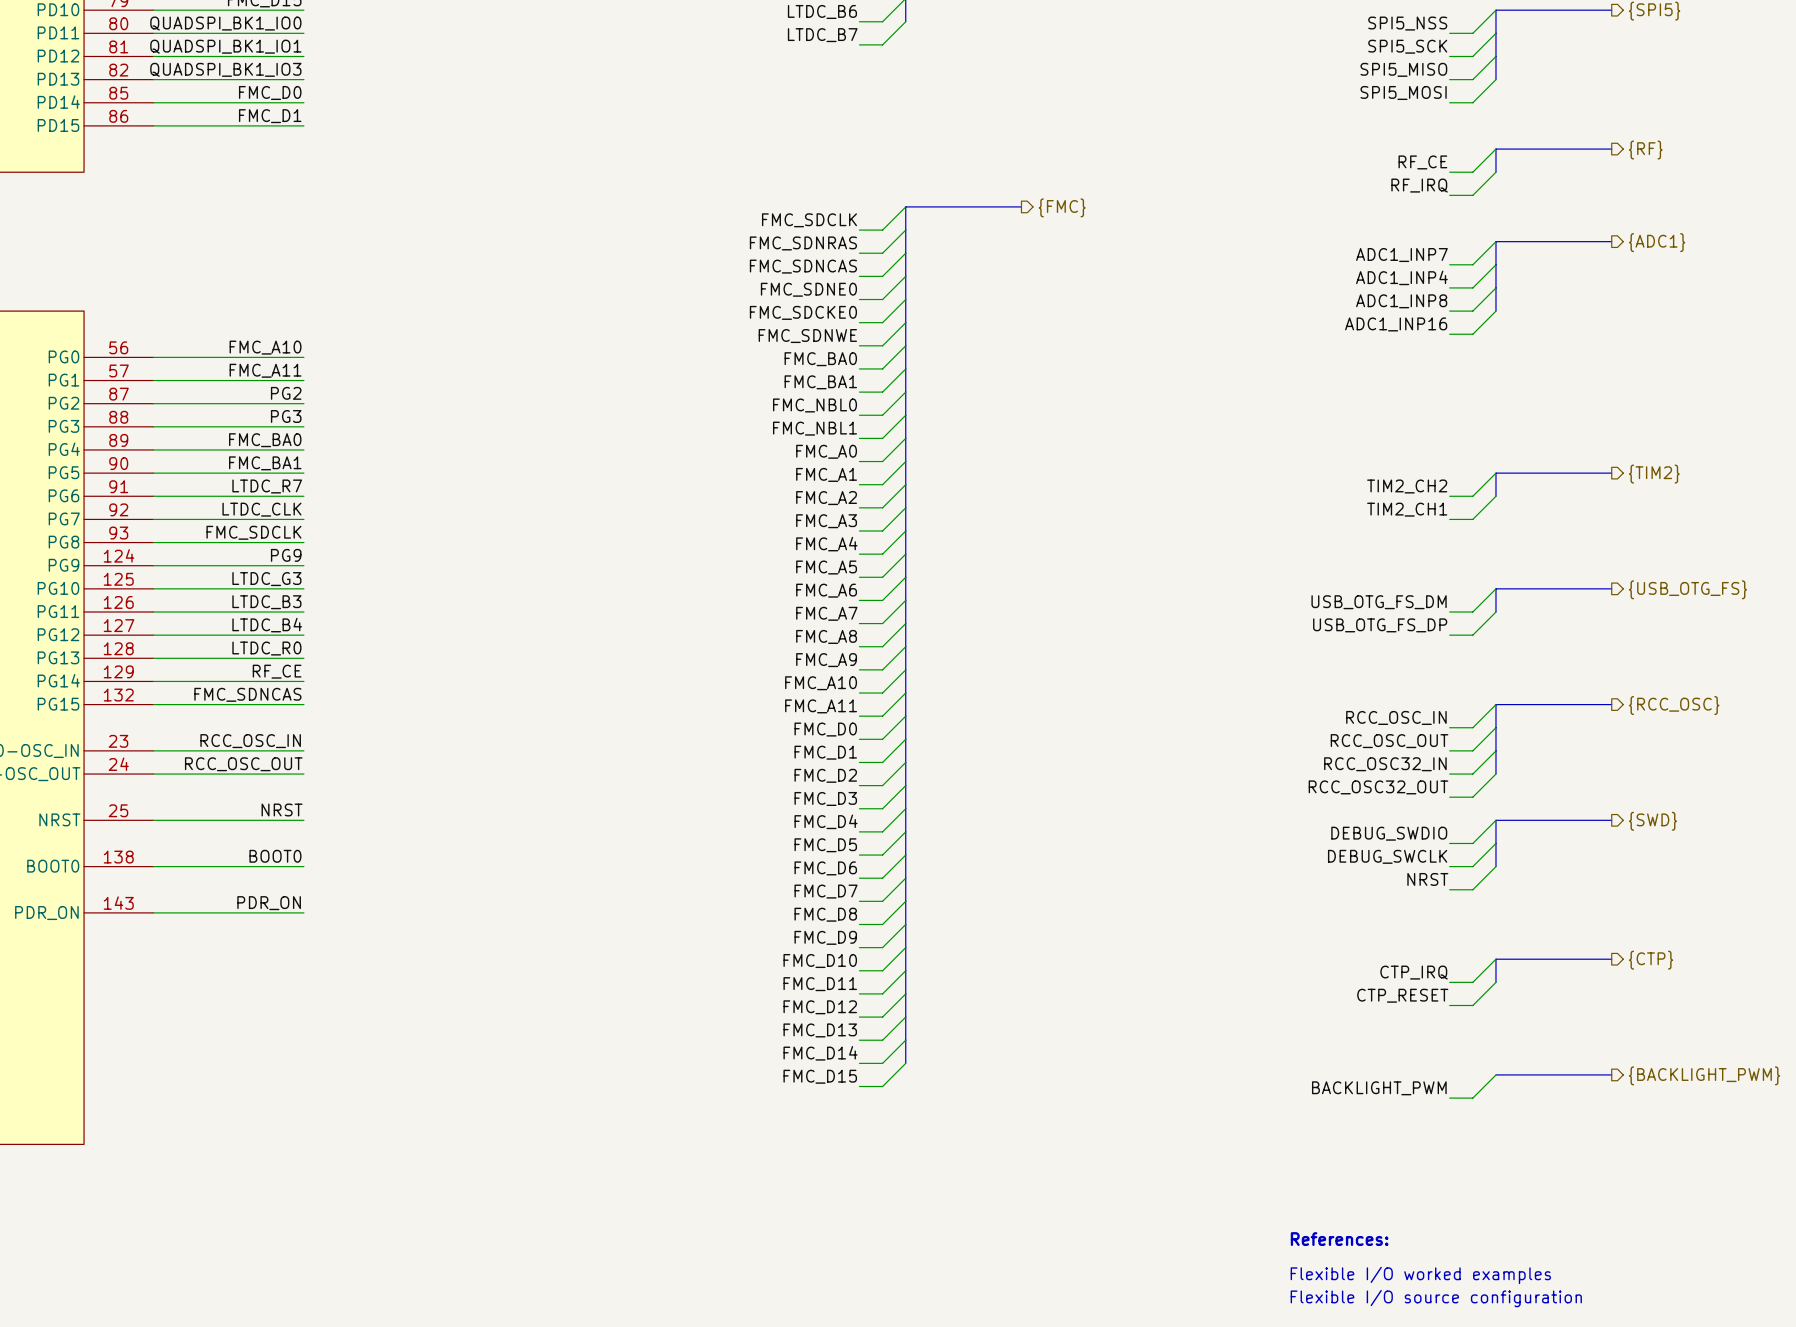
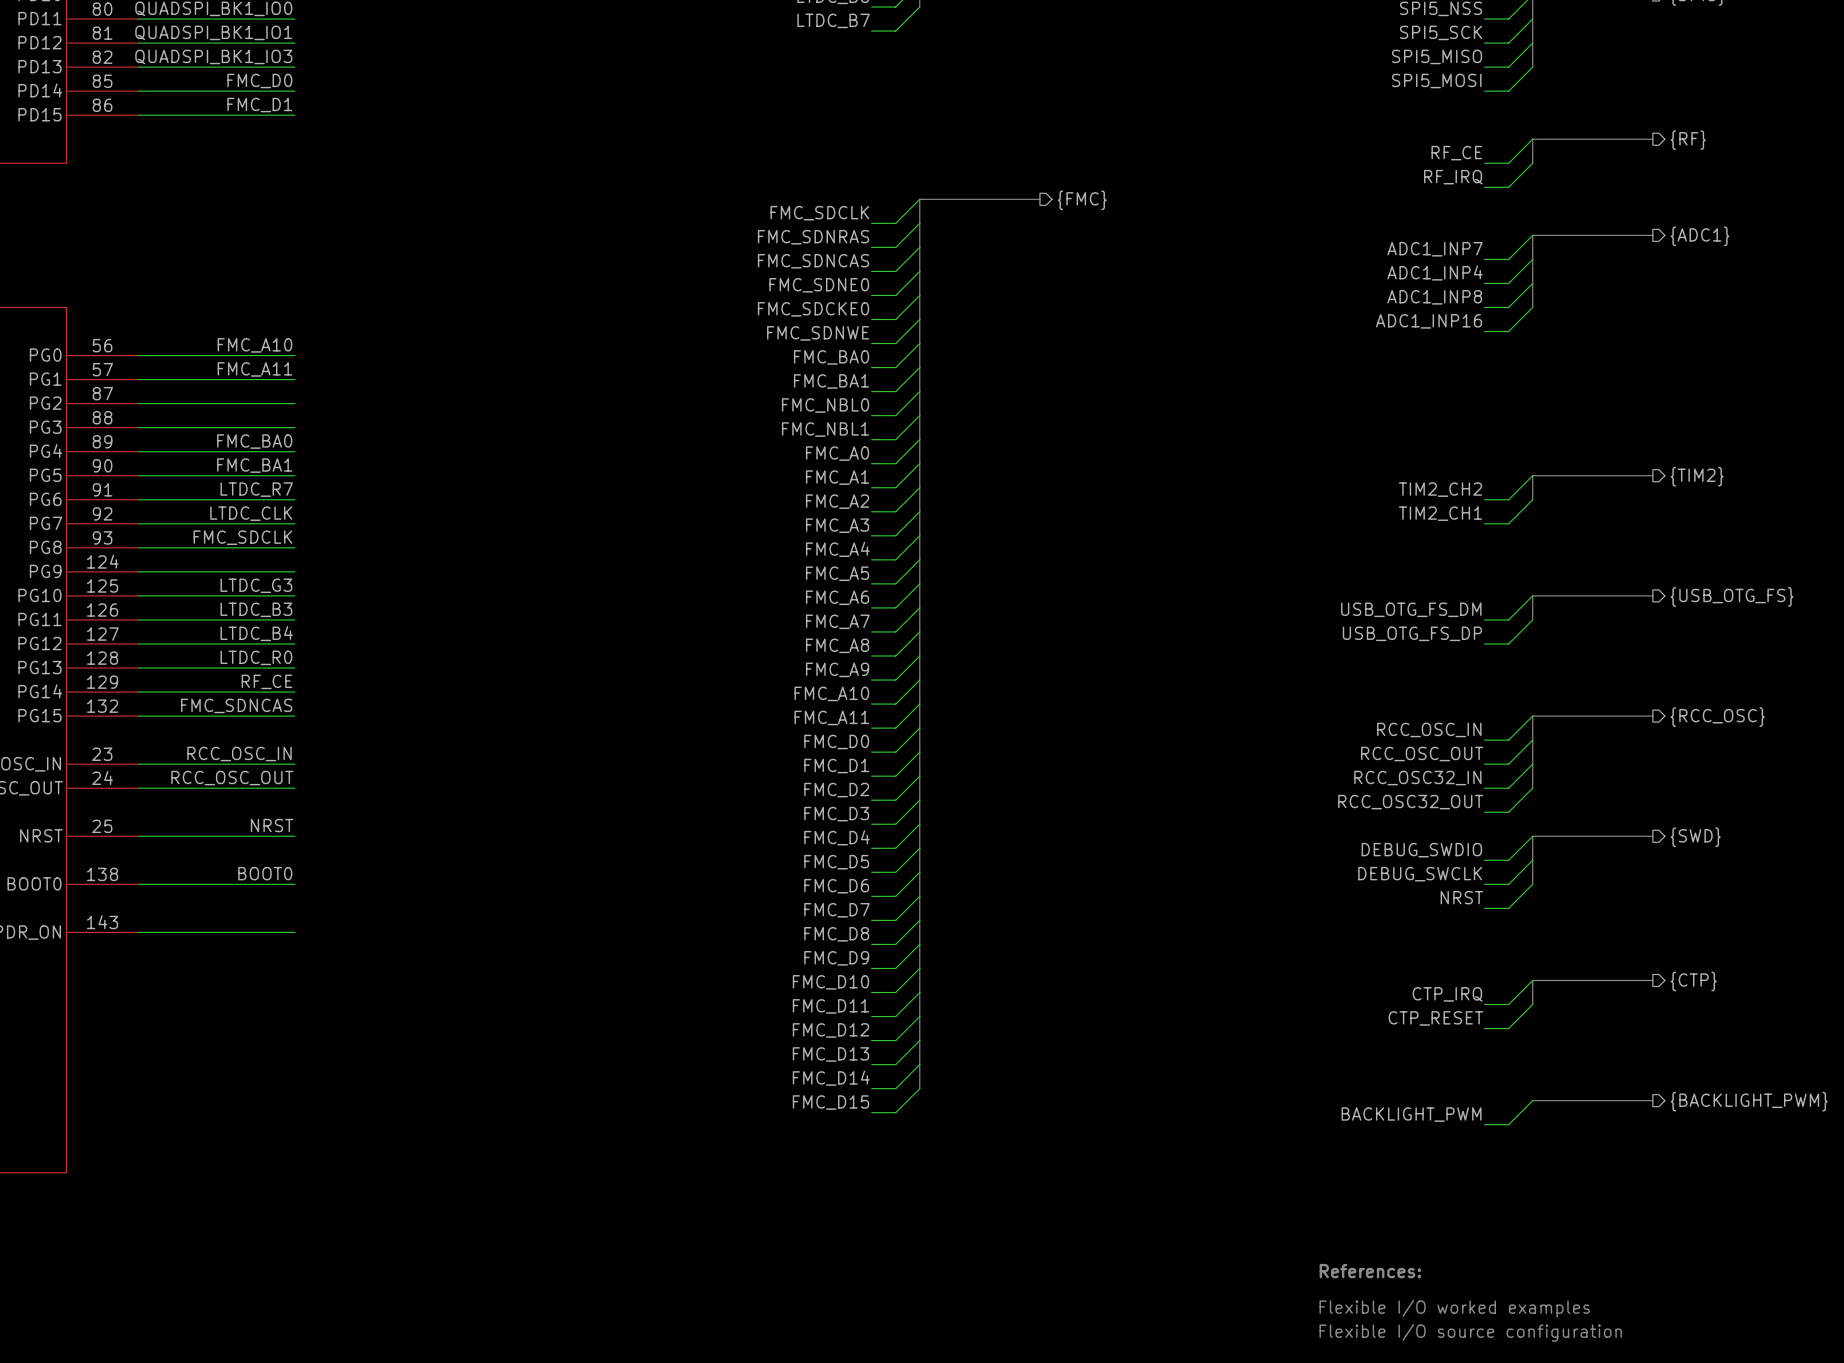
label: PG2 (286, 393) -> none
label: PG3 (286, 416) -> none
label: PG9 (286, 555) -> none
label: PDR_ON (269, 903) -> none

